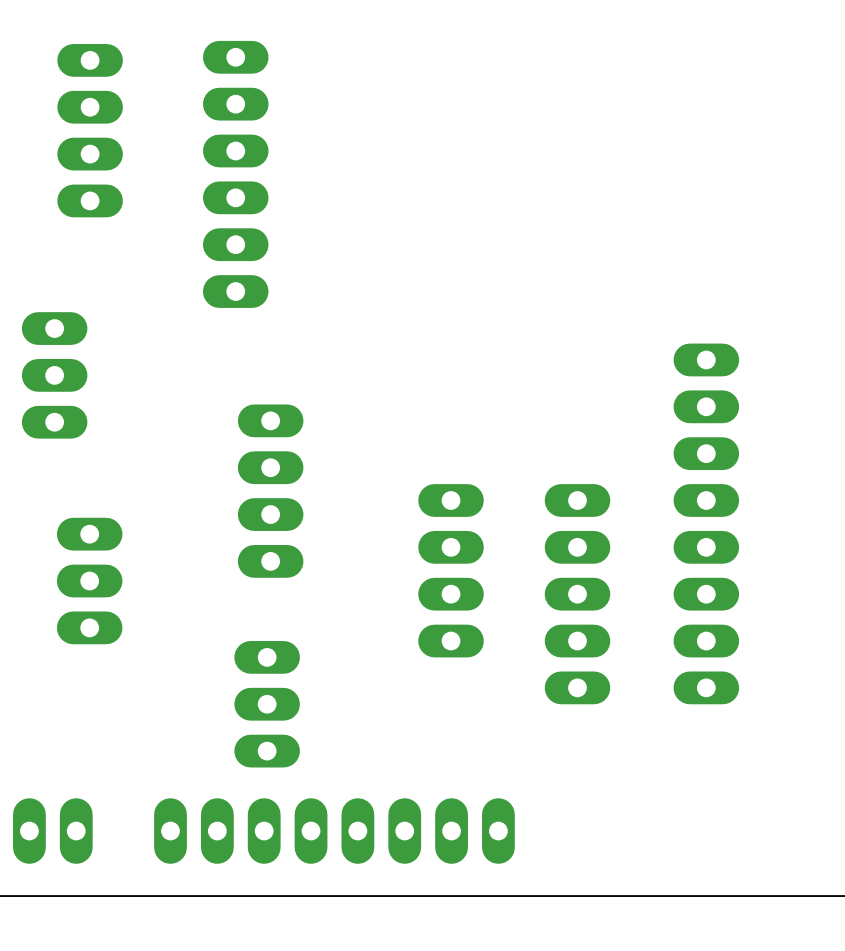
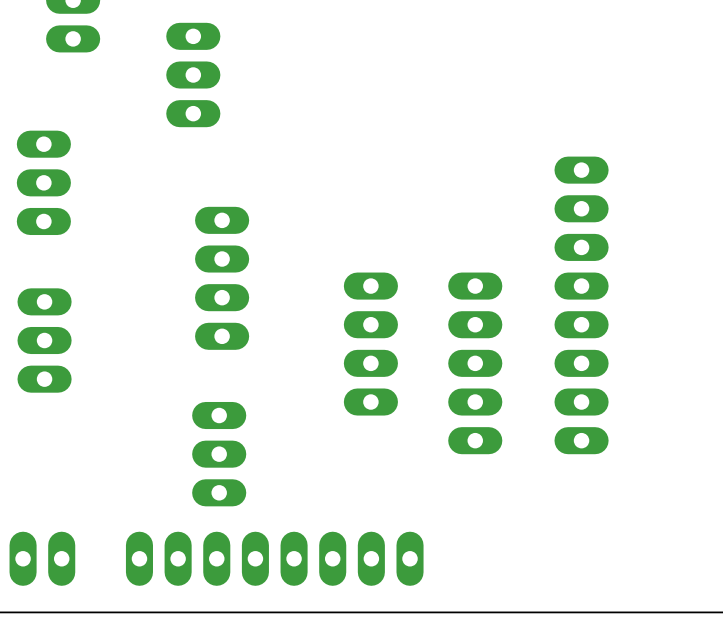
part position: (89, 581) -> (44, 340)

